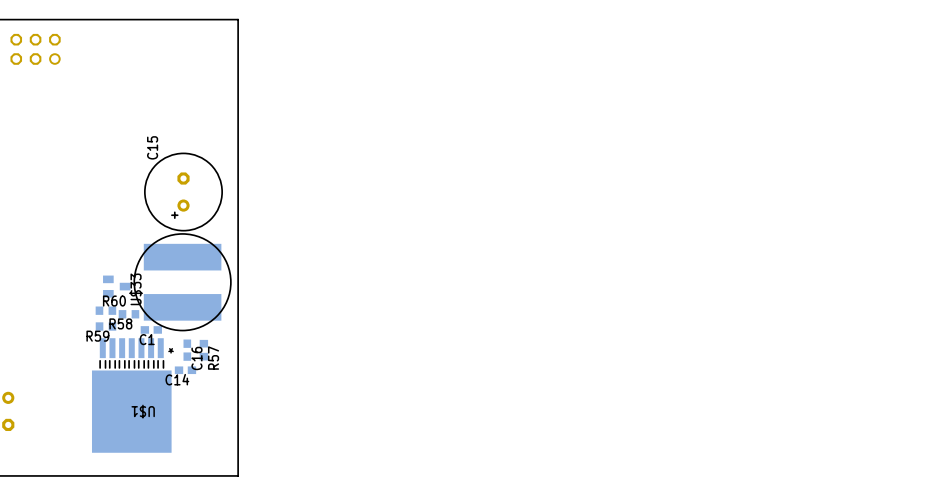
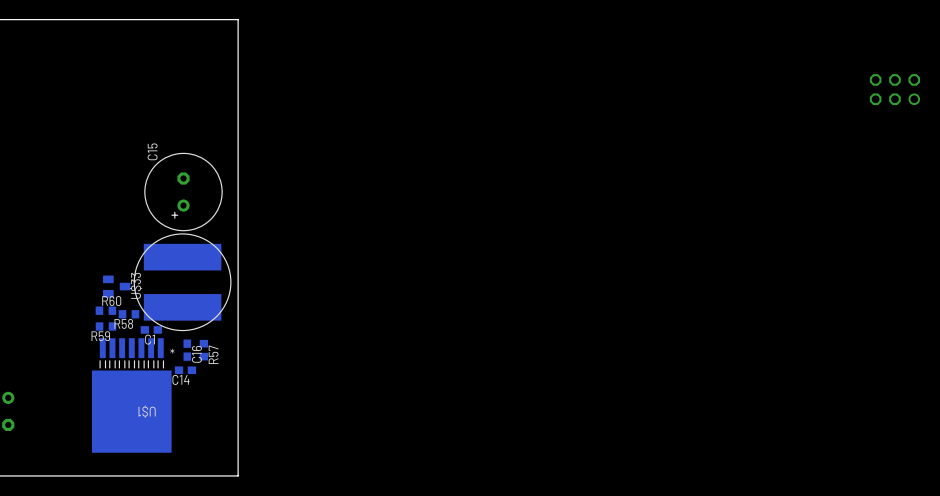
part: (35, 49) -> none
part: none -> (894, 89)

